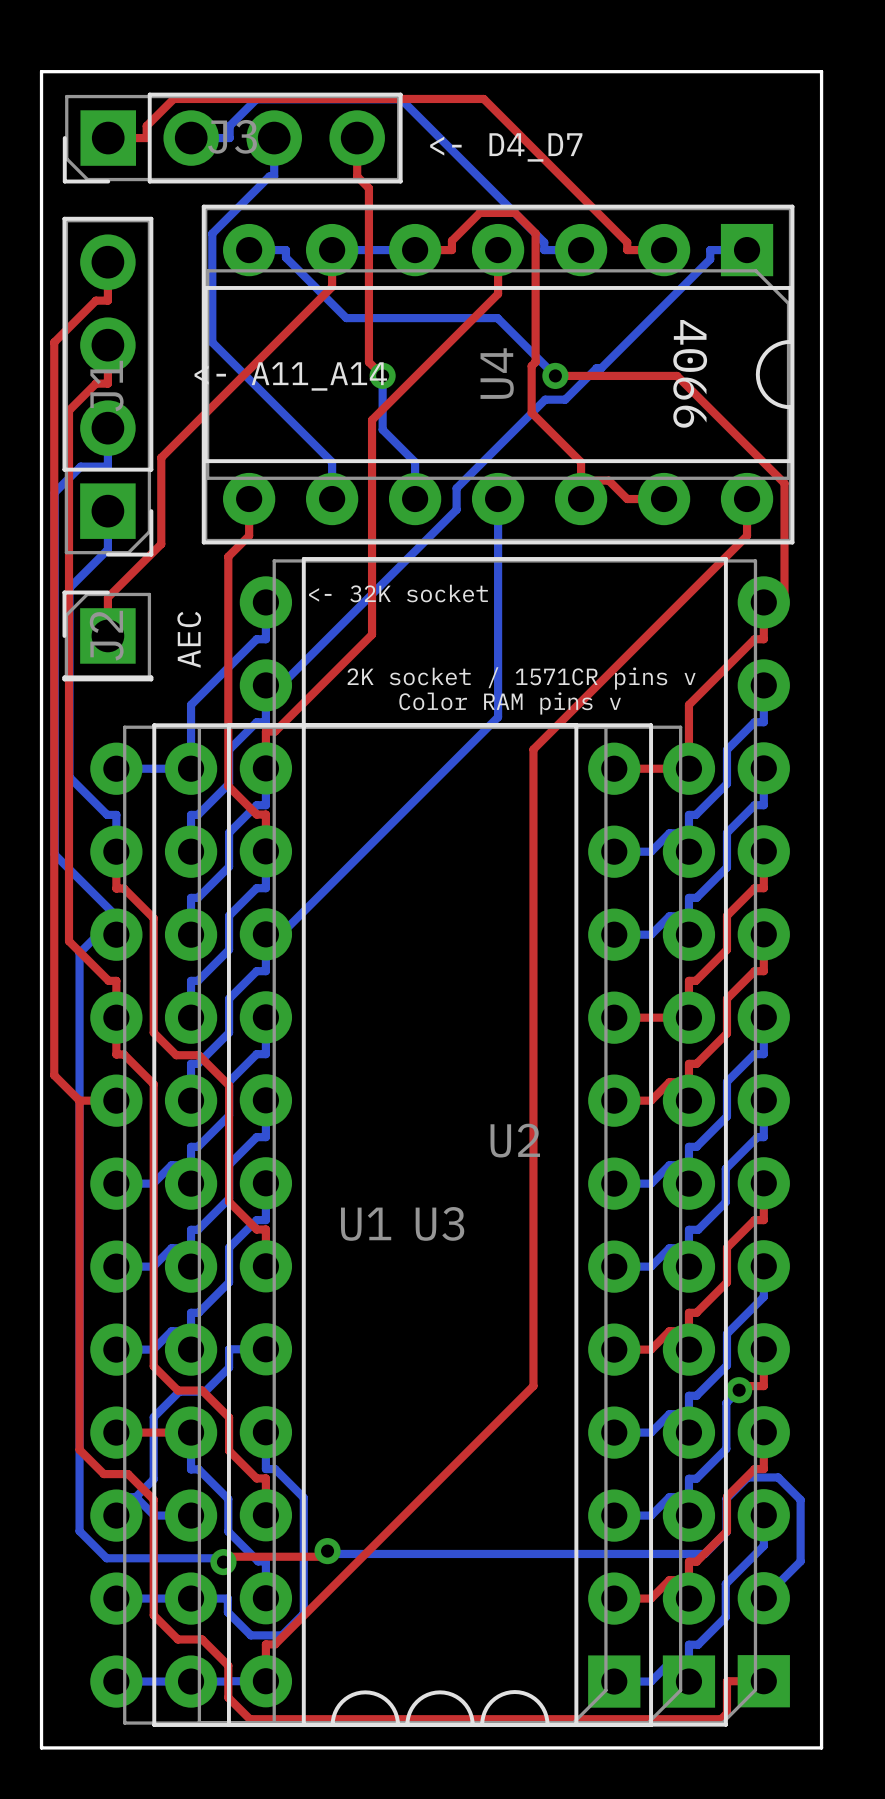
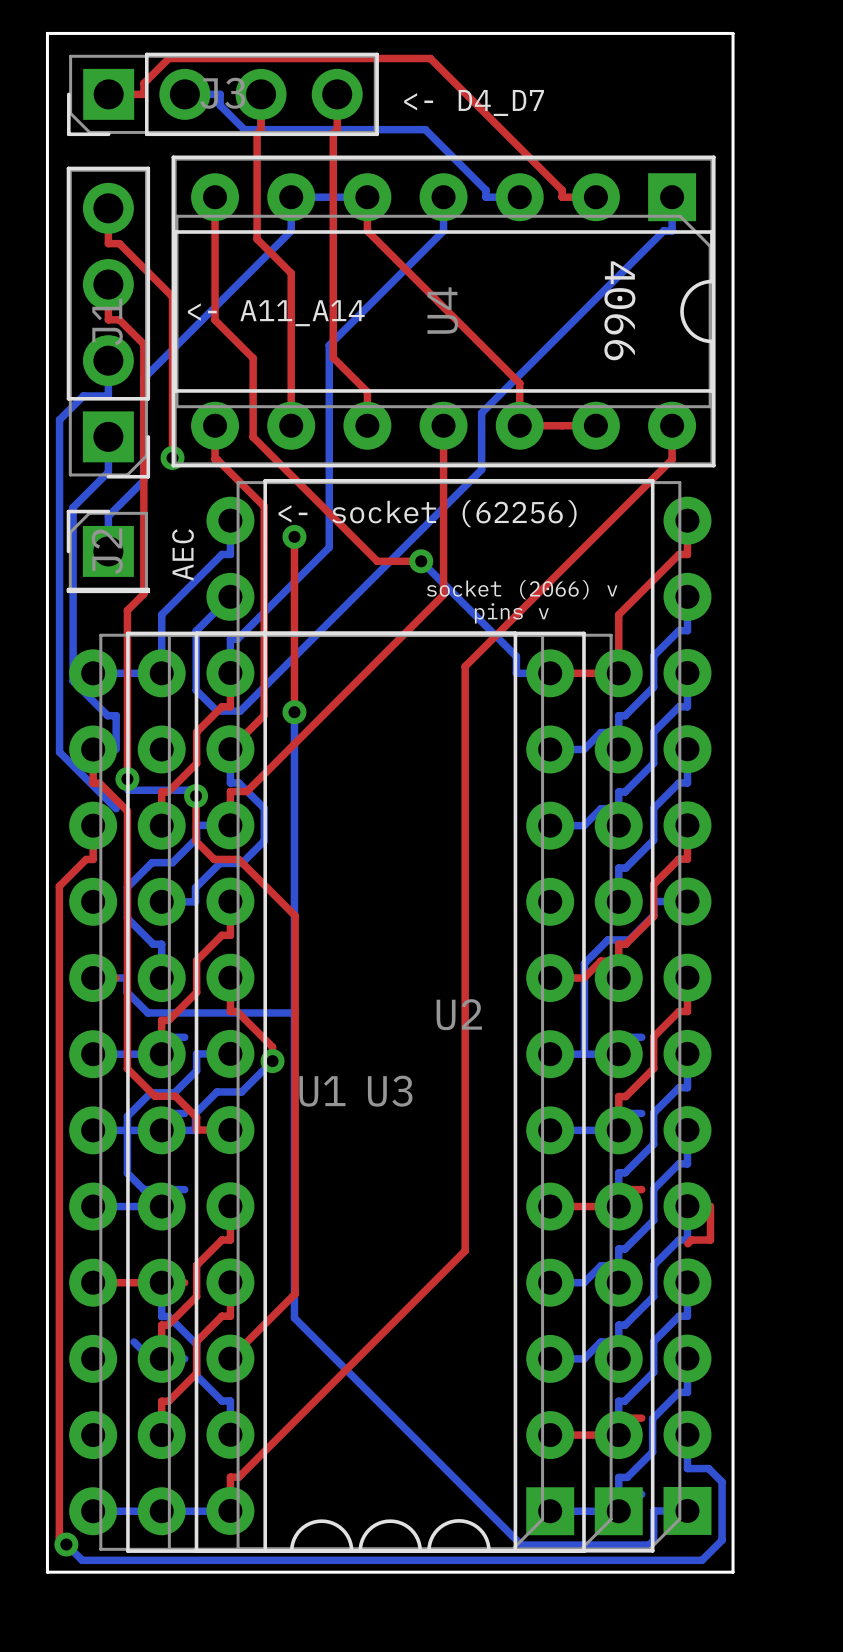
board edge: (788, 71) (821, 71) (821, 1747) (788, 1747) -> (733, 33) (733, 1572)
top track: (458, 98) (483, 98) (627, 242) (627, 250) -> (430, 58) (562, 190) (562, 197) (585, 197)
bottom track: (229, 138) (229, 126) (256, 99) (401, 99) (544, 242) (544, 250) -> (261, 129) (425, 129) (485, 190) (485, 197) (508, 197)
top track: none -> (261, 94) (261, 129) (257, 133) (257, 239) (291, 273) (291, 425)
bottom track: (269, 176) (212, 233) (212, 342) (332, 462) (332, 499) -> (256, 129) (244, 129) (220, 105) (220, 94)
top track: (357, 176) (368, 188) (368, 362) (382, 375) -> (337, 129) (333, 133) (333, 357) (367, 391) (367, 425)
top track: none -> (215, 197) (215, 320) (253, 358) (253, 437) (377, 561) (421, 561)
bottom track: (249, 250) (285, 250) (285, 257) (346, 318) (497, 318) (555, 375) -> none
bottom track: none -> (291, 197) (291, 231) (143, 378) (143, 480) (108, 516) (108, 551)
top track: (332, 250) (332, 286) (161, 457) (161, 544) (107, 597) (107, 635) -> none
top track: (415, 250) (451, 250) (451, 240) (479, 212) (515, 212) (535, 233) (535, 362) (531, 366) (531, 412) (581, 462) (581, 499) -> none
bottom track: none -> (443, 197) (443, 231) (329, 345) (329, 547) (237, 639) (230, 639) (230, 673)
top track: (498, 250) (498, 293) (372, 420) (372, 634) (275, 731) (265, 731) (265, 768) -> none
bottom track: none -> (672, 197) (672, 231) (663, 231) (481, 413) (481, 469) (240, 711) (217, 711) (196, 690) (196, 631) (230, 596)
bottom track: (747, 250) (710, 250) (710, 259) (601, 368) (596, 368) (565, 399) (545, 399) (456, 488) (456, 509) (265, 700) -> none
top track: (107, 300) (95, 300) (54, 342) (54, 1075) (79, 1100) (79, 1449) (103, 1474) (128, 1474) (153, 1499) (153, 1615) (177, 1639) (202, 1639) (228, 1665) (228, 1697) (249, 1719) (721, 1719) (726, 1713) (726, 1681) (763, 1681) -> (108, 243) (119, 243) (172, 296) (172, 457)
U4 position: (498, 374) -> (443, 311)
bottom track: (382, 375) (382, 429) (415, 462) (415, 499) -> none
via: (382, 375) -> none
top track: (555, 375) (677, 375) (784, 483) (784, 600) (763, 620) -> none
via: (555, 375) -> none
top track: (107, 383) (95, 383) (69, 410) (69, 941) (108, 980) (116, 980) (116, 1054) (124, 1054) (153, 1084) (153, 1366) (177, 1390) (202, 1390) (229, 1417) (229, 1450) (256, 1478) (265, 1478) (265, 1515) -> (108, 319) (119, 319) (143, 344) (143, 594) (127, 610) (127, 779)
top track: (581, 480) (608, 480) (627, 499) -> (367, 197) (367, 231) (519, 383) (519, 425) (585, 425)
top track: none -> (215, 425) (215, 459) (217, 459) (264, 506) (264, 715) (230, 749)
top track: (249, 499) (249, 535) (228, 556) (228, 786) (256, 814) (265, 814) (265, 851) -> none
top track: none -> (443, 425) (443, 594) (246, 791) (230, 791) (230, 825)
bottom track: (498, 499) (498, 717) (265, 949) -> none
top track: none -> (672, 425) (672, 459) (465, 666) (465, 1250) (238, 1477) (230, 1477) (230, 1510)
top track: (747, 499) (747, 535) (533, 749) (533, 1386) (275, 1644) (265, 1644) (265, 1681) -> none
via: none -> (172, 457)
text: <- 32K socket (398, 593) -> <- socket (62256) (427, 513)
bottom track: (265, 602) (265, 639) (256, 639) (191, 704) (191, 768) (165, 768) -> (230, 520) (230, 554) (221, 554) (161, 614) (161, 673)
top track: (763, 602) (763, 639) (754, 639) (688, 704) (688, 768) (663, 768) -> (687, 520) (687, 554) (679, 554) (618, 614) (618, 673)
top track: none -> (294, 536) (294, 712)
via: none -> (294, 536)
bottom track: none -> (421, 561) (516, 656) (516, 673) (550, 673)
via: none -> (421, 561)
text: none -> socket (2066) v (522, 589)
text: 2K socket / 1571CR pins v (521, 678) -> none
bottom track: (265, 685) (265, 722) (256, 722) (229, 749) (229, 783) (198, 814) (191, 814) (191, 851) -> (687, 596) (687, 630) (679, 630) (653, 655) (653, 687) (625, 715) (618, 715) (618, 749)
bottom track: (763, 685) (763, 722) (754, 722) (726, 749) (726, 783) (695, 814) (688, 814) (688, 851) -> (687, 673) (687, 706) (679, 706) (653, 732) (653, 763) (625, 791) (618, 791) (618, 825)
text: Color RAM pins v (510, 703) -> none
text: none -> pins v (511, 613)
bottom track: (265, 768) (265, 805) (256, 805) (229, 832) (229, 866) (198, 897) (191, 897) (191, 934) -> none
bottom track: (763, 768) (763, 805) (754, 805) (726, 832) (726, 867) (696, 897) (688, 897) (688, 934) -> none
bottom track: none -> (294, 712) (294, 1318) (521, 1545) (649, 1545) (653, 1540) (653, 1510) (687, 1510)
via: none -> (294, 712)
bottom track: (688, 833) (669, 833) (651, 851) (626, 851) -> (618, 732) (600, 732) (584, 749)
top track: none -> (93, 749) (93, 783) (99, 783) (127, 811) (127, 1068) (154, 1096) (175, 1096) (196, 1117) (196, 1130) (230, 1130)
top track: (116, 851) (116, 888) (124, 888) (153, 918) (153, 1032) (176, 1055) (198, 1055) (229, 1085) (229, 1201) (256, 1229) (265, 1229) (265, 1266) -> none
bottom track: none -> (230, 749) (230, 782) (238, 782) (264, 808) (264, 840) (241, 863) (219, 863) (195, 887) (195, 901) (161, 901)
bottom track: (265, 851) (265, 888) (256, 888) (229, 915) (229, 949) (198, 980) (191, 980) (191, 1017) -> (687, 1053) (687, 1087) (679, 1087) (653, 1113) (653, 1144) (625, 1172) (618, 1172) (618, 1206)
top track: (763, 851) (763, 888) (754, 888) (726, 915) (726, 949) (695, 980) (688, 980) (688, 1017) (614, 1017) -> none
via: none -> (127, 779)
bottom track: none -> (127, 790) (190, 790) (196, 796)
top track: none -> (196, 796) (196, 841) (214, 859) (238, 859) (295, 915) (295, 1293) (230, 1358)
via: none -> (196, 796)
bottom track: (688, 916) (669, 916) (651, 934) (626, 934) -> (618, 808) (600, 808) (584, 825)
top track: none -> (93, 825) (93, 859) (86, 859) (59, 886) (59, 1537) (66, 1544)
bottom track: (116, 934) (116, 916) (79, 953) (79, 1531) (106, 1558) (219, 1558) (223, 1562) -> none
bottom track: none -> (230, 825) (196, 825) (196, 838) (172, 862) (152, 862) (127, 887) (127, 918) (153, 944) (161, 944) (161, 978)
bottom track: (265, 934) (265, 971) (256, 971) (229, 998) (229, 1032) (198, 1063) (191, 1063) (191, 1100) -> (687, 1130) (687, 1163) (679, 1163) (653, 1189) (653, 1220) (625, 1248) (618, 1248) (618, 1282)
top track: none -> (687, 825) (687, 859) (679, 859) (653, 884) (653, 916) (625, 944) (618, 944) (618, 978)
top track: (763, 934) (763, 971) (754, 971) (726, 998) (726, 1033) (696, 1063) (688, 1063) (688, 1100) -> (230, 673) (230, 706) (221, 706) (196, 732) (196, 763) (168, 791) (161, 791) (161, 825)
bottom track: (265, 1017) (265, 1054) (256, 1054) (229, 1081) (229, 1115) (198, 1146) (191, 1146) (191, 1183) -> (687, 1206) (687, 1240) (679, 1240) (653, 1265) (653, 1296) (625, 1325) (618, 1325) (618, 1358)
bottom track: none -> (687, 901) (653, 901) (653, 915) (629, 939) (608, 939) (584, 963) (584, 1054)
bottom track: (763, 1017) (763, 1054) (754, 1054) (726, 1081) (726, 1116) (696, 1146) (688, 1146) (688, 1183) -> none
top track: (688, 1082) (669, 1082) (651, 1100) (626, 1100) -> (618, 961) (600, 961) (584, 978)
bottom track: none -> (93, 978) (126, 978) (126, 992) (147, 1012) (294, 1012)
top track: none -> (230, 977) (230, 1011) (237, 1011) (272, 1047) (272, 1061)
bottom track: (265, 1100) (265, 1137) (256, 1137) (229, 1164) (229, 1198) (198, 1229) (191, 1229) (191, 1266) -> (687, 1282) (687, 1316) (679, 1316) (653, 1341) (653, 1372) (624, 1401) (618, 1401) (618, 1435)
bottom track: (763, 1100) (763, 1137) (757, 1137) (725, 1168) (725, 1202) (698, 1229) (688, 1229) (688, 1266) -> none
U2 position: (514, 1141) -> (458, 1015)
bottom track: none -> (230, 1053) (196, 1053) (196, 1070) (174, 1092) (150, 1092) (127, 1116) (127, 1173) (143, 1189) (161, 1189) (161, 1206)
bottom track: (265, 1183) (265, 1220) (256, 1220) (229, 1247) (229, 1282) (198, 1312) (191, 1312) (191, 1349) -> (687, 749) (687, 782) (679, 782) (653, 808) (653, 840) (625, 868) (618, 868) (618, 901)
top track: (763, 1183) (763, 1220) (754, 1220) (726, 1247) (726, 1282) (696, 1312) (688, 1312) (688, 1349) -> (230, 901) (230, 935) (221, 935) (196, 960) (196, 992) (168, 1020) (161, 1020) (161, 1054)
bottom track: none -> (272, 1061) (241, 1091) (217, 1091) (195, 1113) (195, 1130) (161, 1130)
via: none -> (272, 1061)
U1 position: (365, 1225) -> (321, 1092)
U3 position: (440, 1225) -> (390, 1092)
bottom track: (763, 1266) (763, 1297) (726, 1333) (726, 1365) (696, 1395) (688, 1395) (688, 1432) -> none
top track: none -> (230, 1206) (230, 1240) (221, 1240) (196, 1265) (196, 1296) (168, 1325) (161, 1325) (161, 1358)
bottom track: (265, 1349) (229, 1349) (229, 1367) (205, 1391) (179, 1391) (153, 1417) (153, 1479) (135, 1497) (116, 1497) (116, 1515) -> none
bottom track: (739, 1390) (726, 1402) (726, 1448) (696, 1478) (688, 1478) (688, 1515) -> none
via: (739, 1390) -> none
bottom track: (688, 1414) (669, 1414) (651, 1432) (626, 1432) -> (618, 1265) (600, 1265) (584, 1282)
bottom track: none -> (161, 1282) (161, 1316) (168, 1316) (196, 1344) (196, 1375) (221, 1400) (230, 1400) (230, 1434)
bottom track: (191, 1432) (191, 1469) (198, 1469) (228, 1499) (228, 1531) (258, 1561) (265, 1561) (265, 1598) -> none
top track: none -> (230, 1282) (230, 1316) (221, 1316) (196, 1341) (196, 1373) (168, 1401) (161, 1401) (161, 1435)
bottom track: (265, 1432) (265, 1469) (275, 1469) (303, 1497) (303, 1613) (282, 1635) (250, 1635) (227, 1612) (227, 1598) (116, 1598) -> none
top track: (763, 1432) (763, 1469) (754, 1469) (726, 1496) (726, 1531) (696, 1561) (688, 1561) (688, 1598) -> (687, 977) (687, 1011) (679, 1011) (653, 1036) (653, 1068) (625, 1096) (618, 1096) (618, 1130)
bottom track: (688, 1497) (669, 1497) (651, 1515) (626, 1515) -> (618, 1341) (600, 1341) (584, 1358)
bottom track: none -> (687, 1358) (687, 1392) (679, 1392) (652, 1418) (652, 1452) (627, 1477) (618, 1477) (618, 1511)
bottom track: (763, 1515) (763, 1545) (725, 1583) (725, 1617) (698, 1644) (688, 1644) (688, 1681) -> none
top track: (327, 1551) (321, 1556) (228, 1556) (223, 1562) -> none
bottom track: (327, 1551) (330, 1553) (704, 1553) (726, 1532) (726, 1498) (747, 1477) (778, 1477) (800, 1499) (800, 1561) (763, 1598) -> none
via: (327, 1551) -> none
via: (223, 1562) -> none
bottom track: none -> (687, 1434) (687, 1468) (708, 1468) (722, 1482) (722, 1540) (702, 1560) (82, 1560) (66, 1544)
via: none -> (66, 1544)

